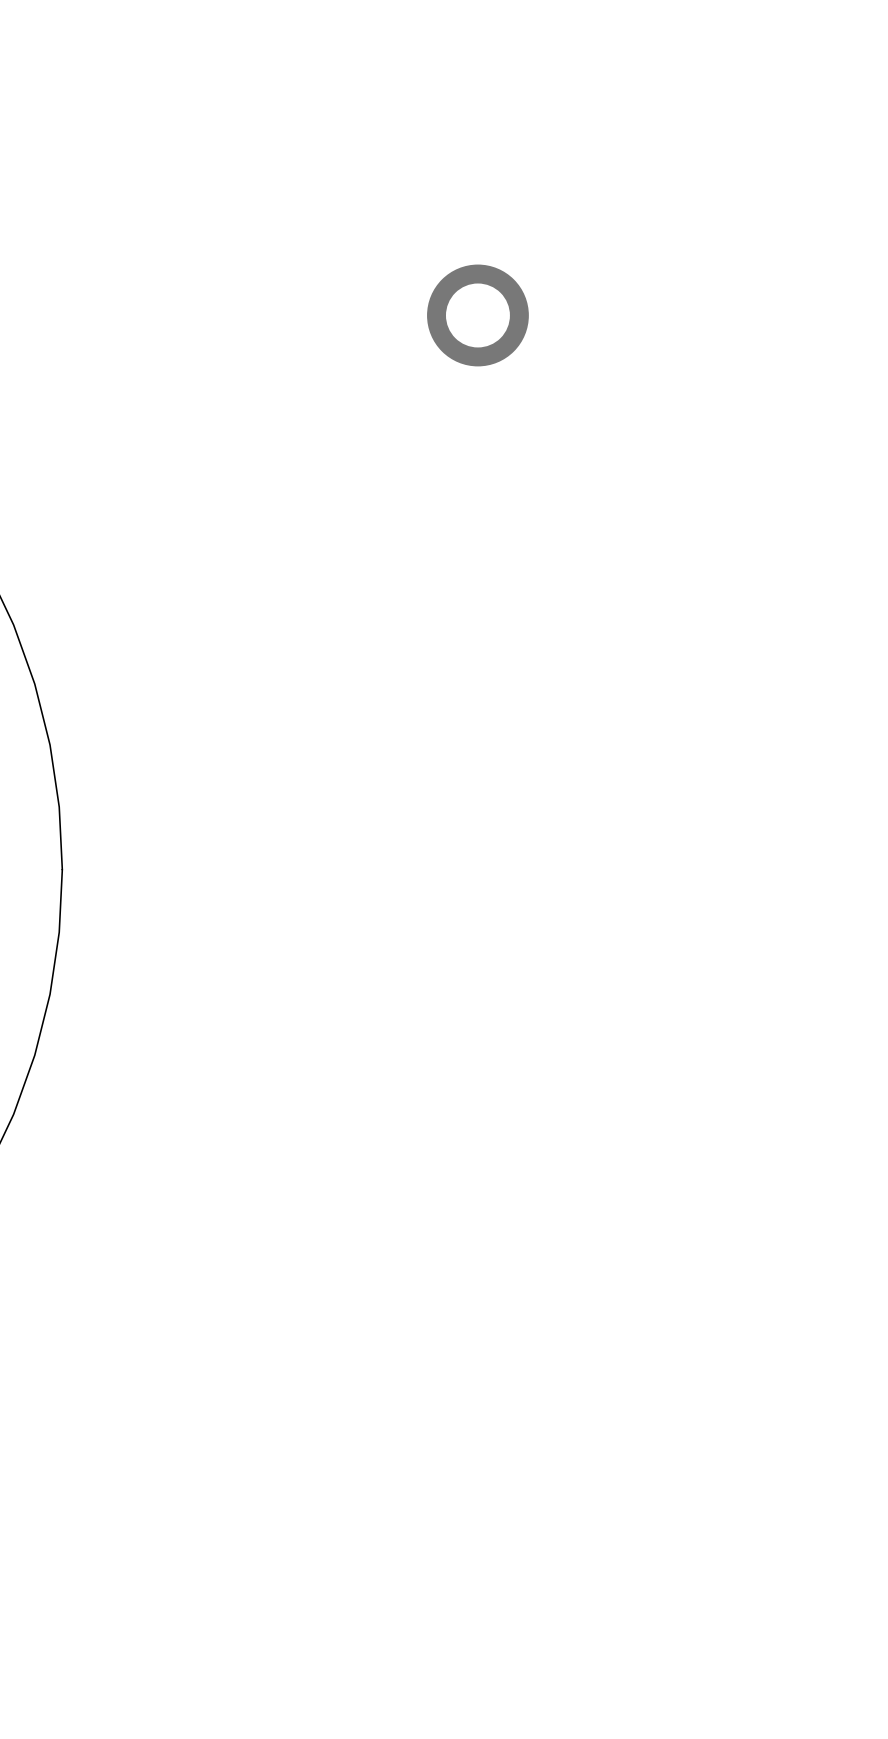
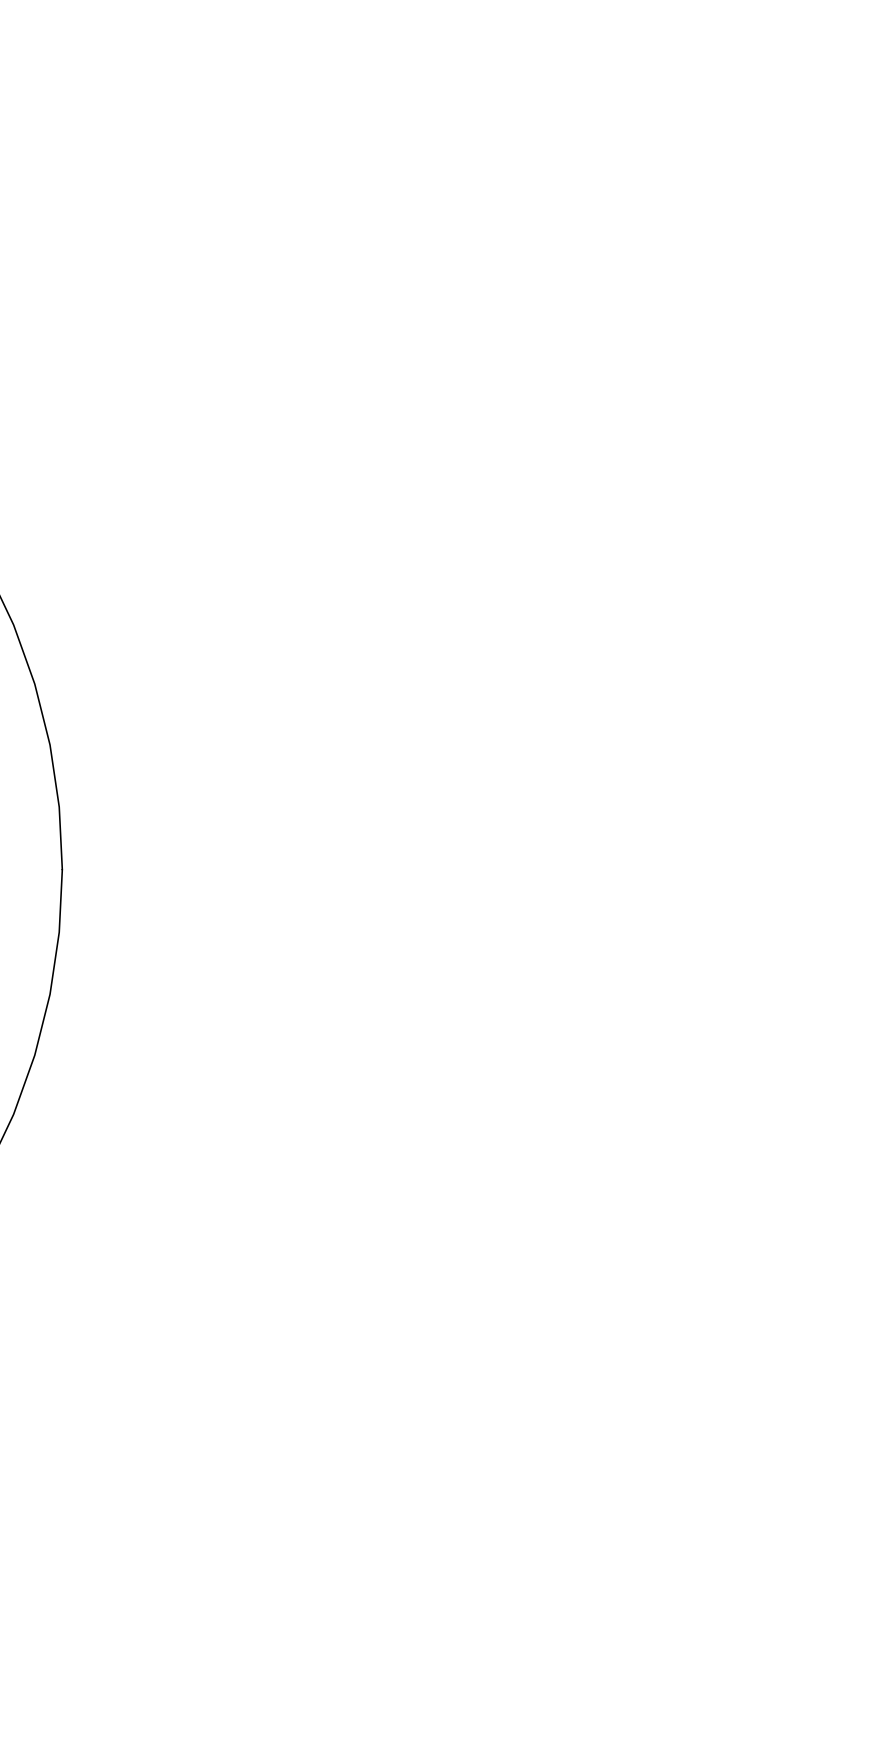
via: (477, 315) -> none

